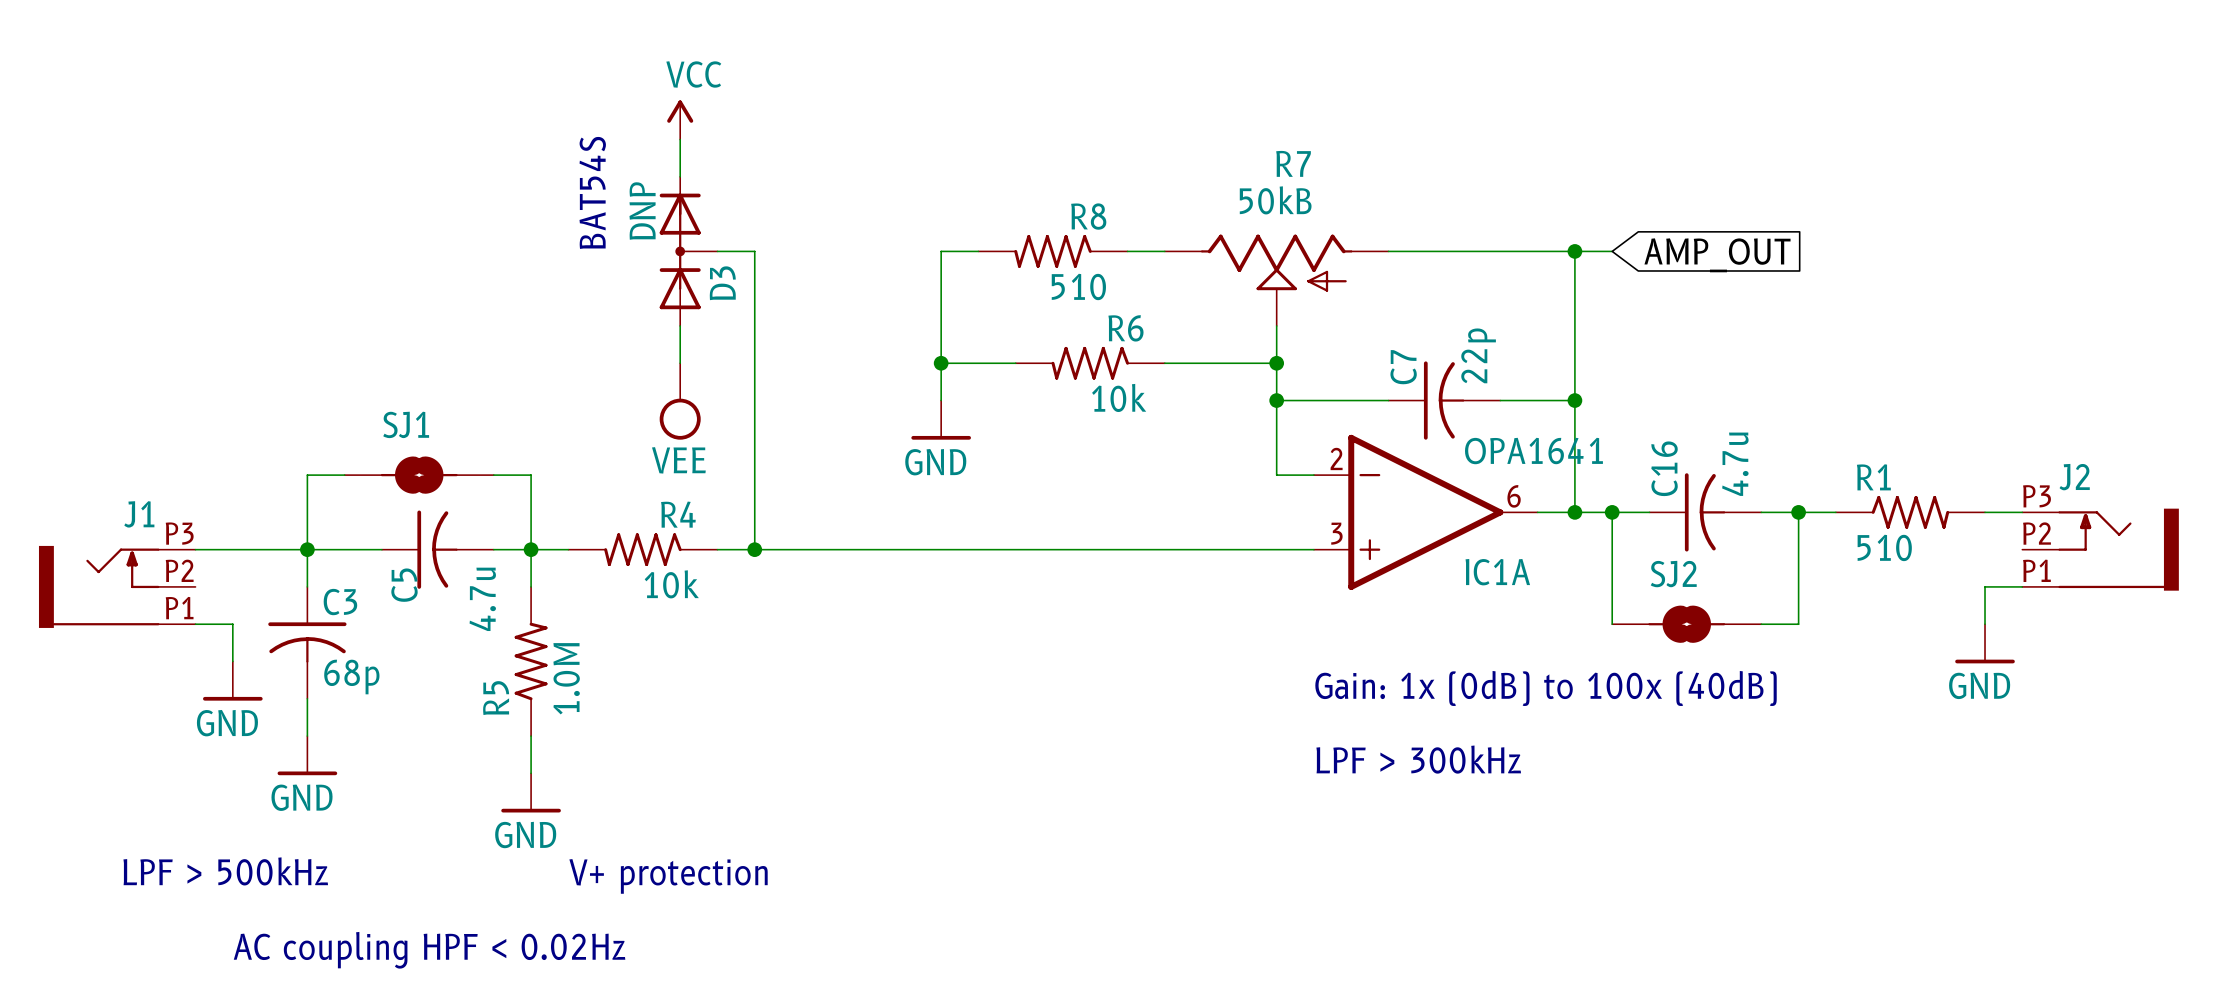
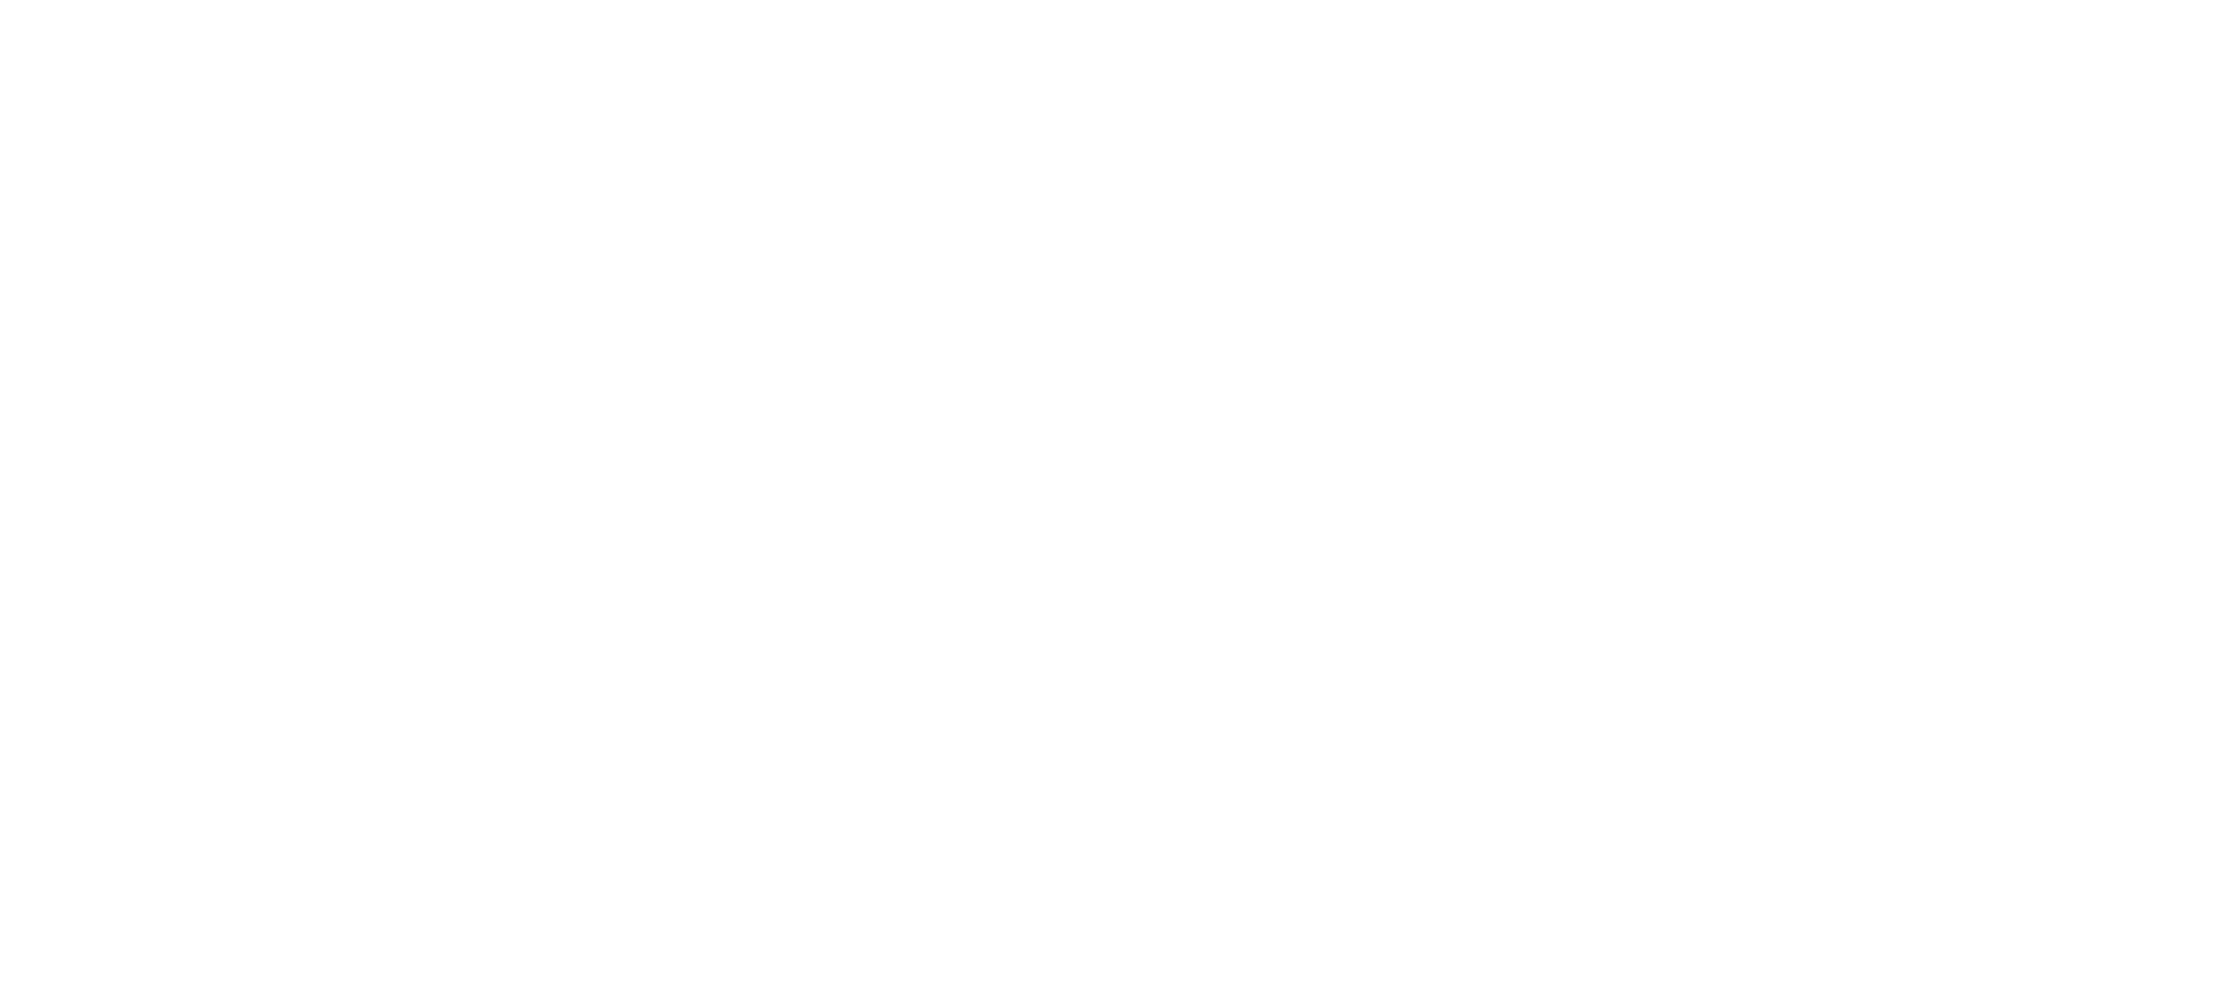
power symbol: VCC (680, 120) -> none
wire: (680, 139) (680, 176) -> none
text: BAT54S (592, 192) -> none
D3: DNP (688, 251) -> none
wire: (717, 251) (754, 251) (754, 549) -> none
wire: (978, 251) (941, 251) (941, 400) -> none
R8: 510 (1053, 251) -> none
wire: (1127, 251) (1164, 251) -> none
wire: (1388, 251) (1612, 251) -> none
wire: (1574, 251) (1574, 512) -> none
junction: (1574, 251) -> none
global label: AMP_OUT (1717, 255) -> none
R7: 50kB (1276, 280) -> none
wire: (680, 325) (680, 363) -> none
wire: (1276, 325) (1276, 475) (1313, 475) -> none
wire: (941, 363) (1015, 363) -> none
junction: (941, 363) -> none
R6: 10k (1090, 363) -> none
wire: (1164, 363) (1276, 363) -> none
junction: (1276, 363) -> none
wire: (1276, 400) (1388, 400) -> none
junction: (1276, 400) -> none
C7: 22p (1444, 400) -> none
wire: (1500, 400) (1574, 400) -> none
junction: (1574, 400) -> none
power symbol: VEE (680, 401) -> none
power symbol: GND (941, 420) -> none
wire: (344, 475) (307, 475) (307, 586) -> none
SJ1: (419, 475) -> none
wire: (493, 475) (531, 475) (531, 586) -> none
IC1A: OPA1641 (1425, 512) -> none
wire: (1537, 512) (1649, 512) -> none
junction: (1574, 512) -> none
wire: (1612, 512) (1612, 624) -> none
junction: (1612, 512) -> none
C16: 4.7u (1705, 512) -> none
wire: (1761, 512) (1835, 512) -> none
wire: (1798, 512) (1798, 624) (1761, 624) -> none
junction: (1798, 512) -> none
R1: 510 (1910, 512) -> none
wire: (1985, 512) (2022, 512) -> none
wire: (195, 549) (381, 549) -> none
junction: (307, 549) -> none
C5: 4.7u (437, 549) -> none
wire: (493, 549) (568, 549) -> none
junction: (531, 549) -> none
R4: 10k (642, 549) -> none
wire: (717, 549) (1313, 549) -> none
junction: (754, 549) -> none
J2: (2100, 549) -> none
J1: (117, 586) -> none
wire: (2022, 586) (1985, 586) (1985, 624) -> none
wire: (195, 624) (232, 624) (232, 661) -> none
SJ2: (1686, 624) -> none
C3: 68p (307, 642) -> none
power symbol: GND (1985, 643) -> none
R5: 1.0M (531, 661) -> none
power symbol: GND (232, 681) -> none
text: Gain: 1x (0dB) to 100x (40dB) (1546, 688) -> none
wire: (307, 698) (307, 736) -> none
wire: (531, 736) (531, 773) -> none
power symbol: GND (307, 755) -> none
text: LPF > 300kHz (1418, 759) -> none
power symbol: GND (531, 792) -> none
text: LPF > 500kHz (225, 871) -> none
text: V+ protection (668, 876) -> none
text: AC coupling HPF < 0.02Hz (429, 950) -> none

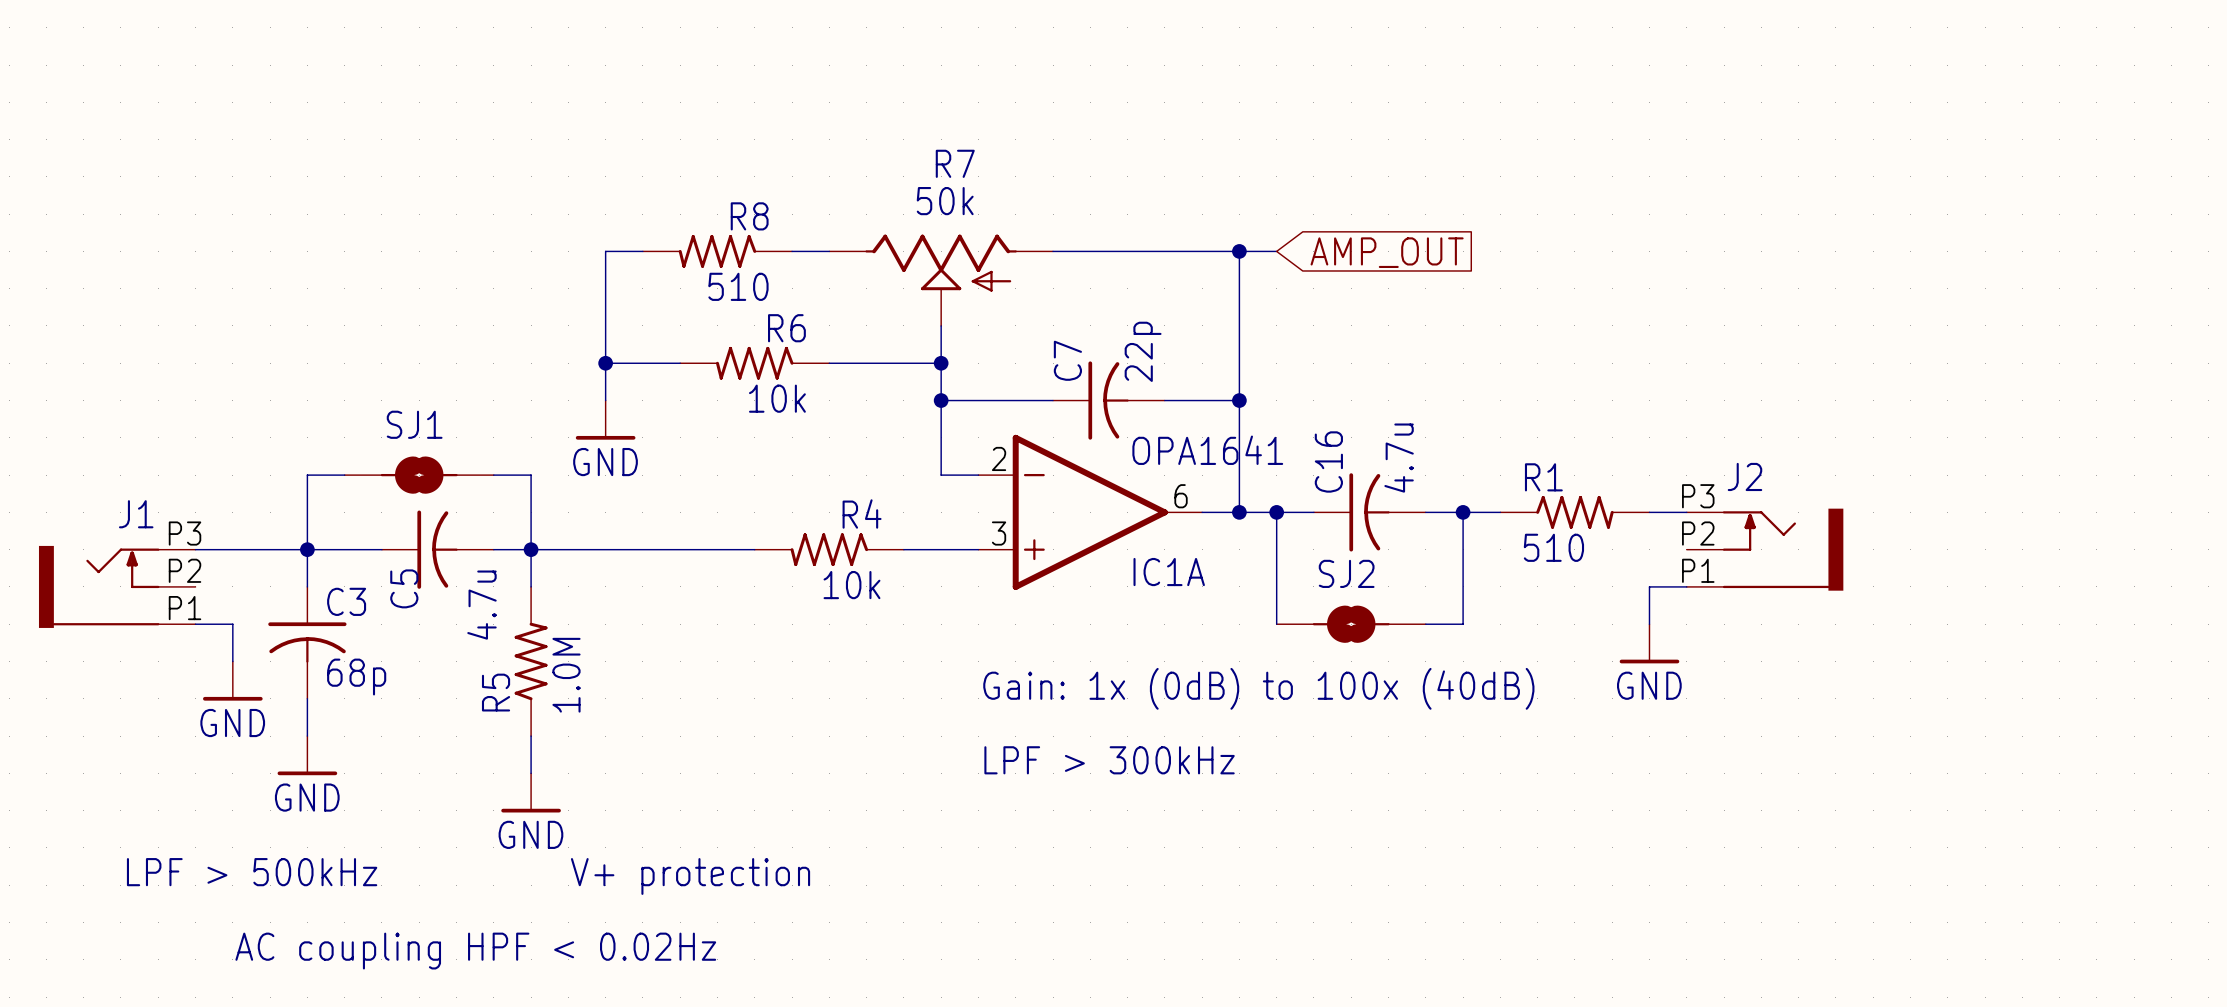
wire: none -> (642, 251) (605, 251) (605, 400)
R8: none -> 510 (717, 251)
wire: none -> (792, 251) (829, 251)
wire: none -> (1053, 251) (1276, 251)
wire: none -> (1239, 251) (1239, 512)
junction: none -> (1239, 251)
global label: none -> AMP_OUT (1387, 252)
R7: none -> 50k (941, 280)
wire: none -> (941, 325) (941, 475) (978, 475)
wire: none -> (605, 363) (680, 363)
junction: none -> (605, 363)
R6: none -> 10k (754, 363)
wire: none -> (829, 363) (941, 363)
junction: none -> (941, 363)
wire: none -> (941, 400) (1053, 400)
junction: none -> (941, 400)
C7: none -> 22p (1108, 400)
wire: none -> (1164, 400) (1239, 400)
junction: none -> (1239, 400)
power symbol: none -> GND (605, 420)
wire: none -> (344, 475) (307, 475) (307, 586)
SJ1: none -> (419, 475)
wire: none -> (493, 475) (531, 475) (531, 586)
IC1A: none -> OPA1641 (1090, 512)
wire: none -> (1202, 512) (1313, 512)
junction: none -> (1239, 512)
wire: none -> (1276, 512) (1276, 624)
junction: none -> (1276, 512)
C16: none -> 4.7u (1369, 512)
wire: none -> (1425, 512) (1500, 512)
wire: none -> (1463, 512) (1463, 624) (1425, 624)
junction: none -> (1463, 512)
R1: none -> 510 (1574, 512)
wire: none -> (1649, 512) (1686, 512)
wire: none -> (195, 549) (381, 549)
junction: none -> (307, 549)
C5: none -> 4.7u (437, 549)
wire: none -> (493, 549) (754, 549)
junction: none -> (531, 549)
R4: none -> 10k (829, 549)
wire: none -> (903, 549) (978, 549)
J2: none -> (1765, 549)
J1: none -> (117, 586)
wire: none -> (1686, 586) (1649, 586) (1649, 624)
wire: none -> (195, 624) (232, 624) (232, 661)
SJ2: none -> (1351, 624)
C3: none -> 68p (307, 642)
power symbol: none -> GND (1649, 643)
R5: none -> 1.0M (531, 661)
power symbol: none -> GND (232, 681)
text: none -> Gain: 1x (0dB) to 100x (40dB) (1258, 688)
wire: none -> (307, 698) (307, 736)
wire: none -> (531, 736) (531, 773)
power symbol: none -> GND (307, 755)
text: none -> LPF > 300kHz (1109, 760)
power symbol: none -> GND (531, 792)
text: none -> LPF > 500kHz (252, 872)
text: none -> V+ protection (690, 876)
text: none -> AC coupling HPF < 0.02Hz (475, 951)

